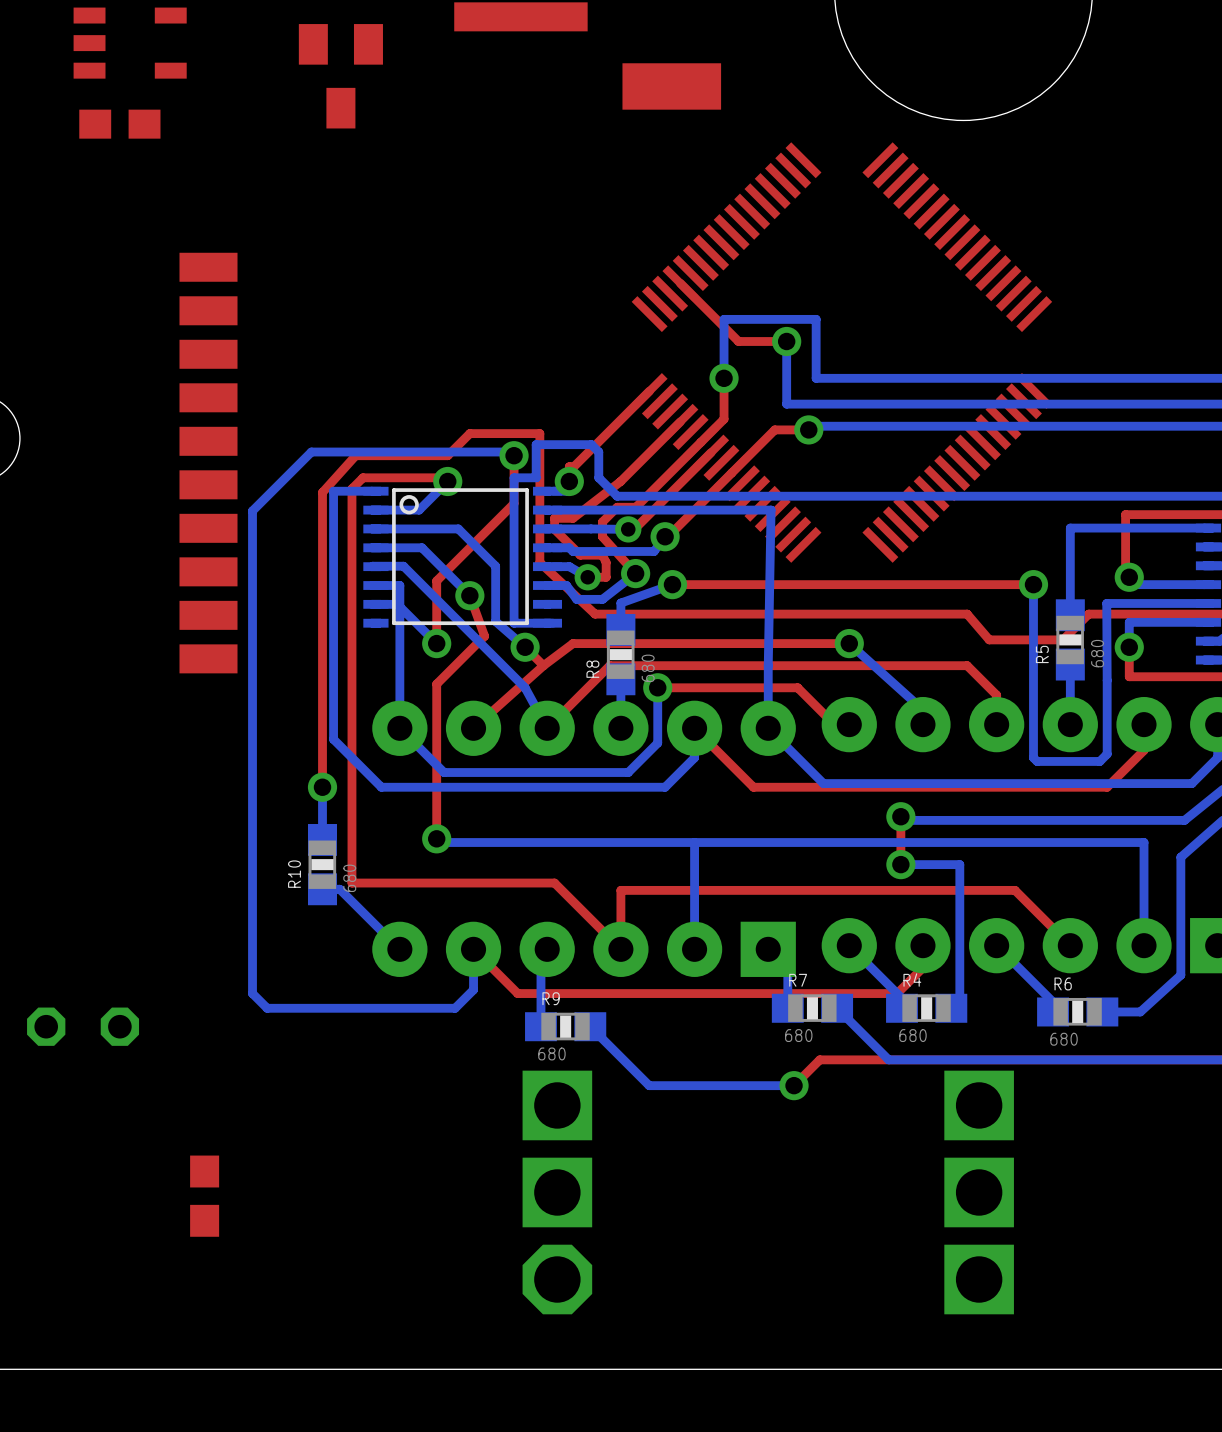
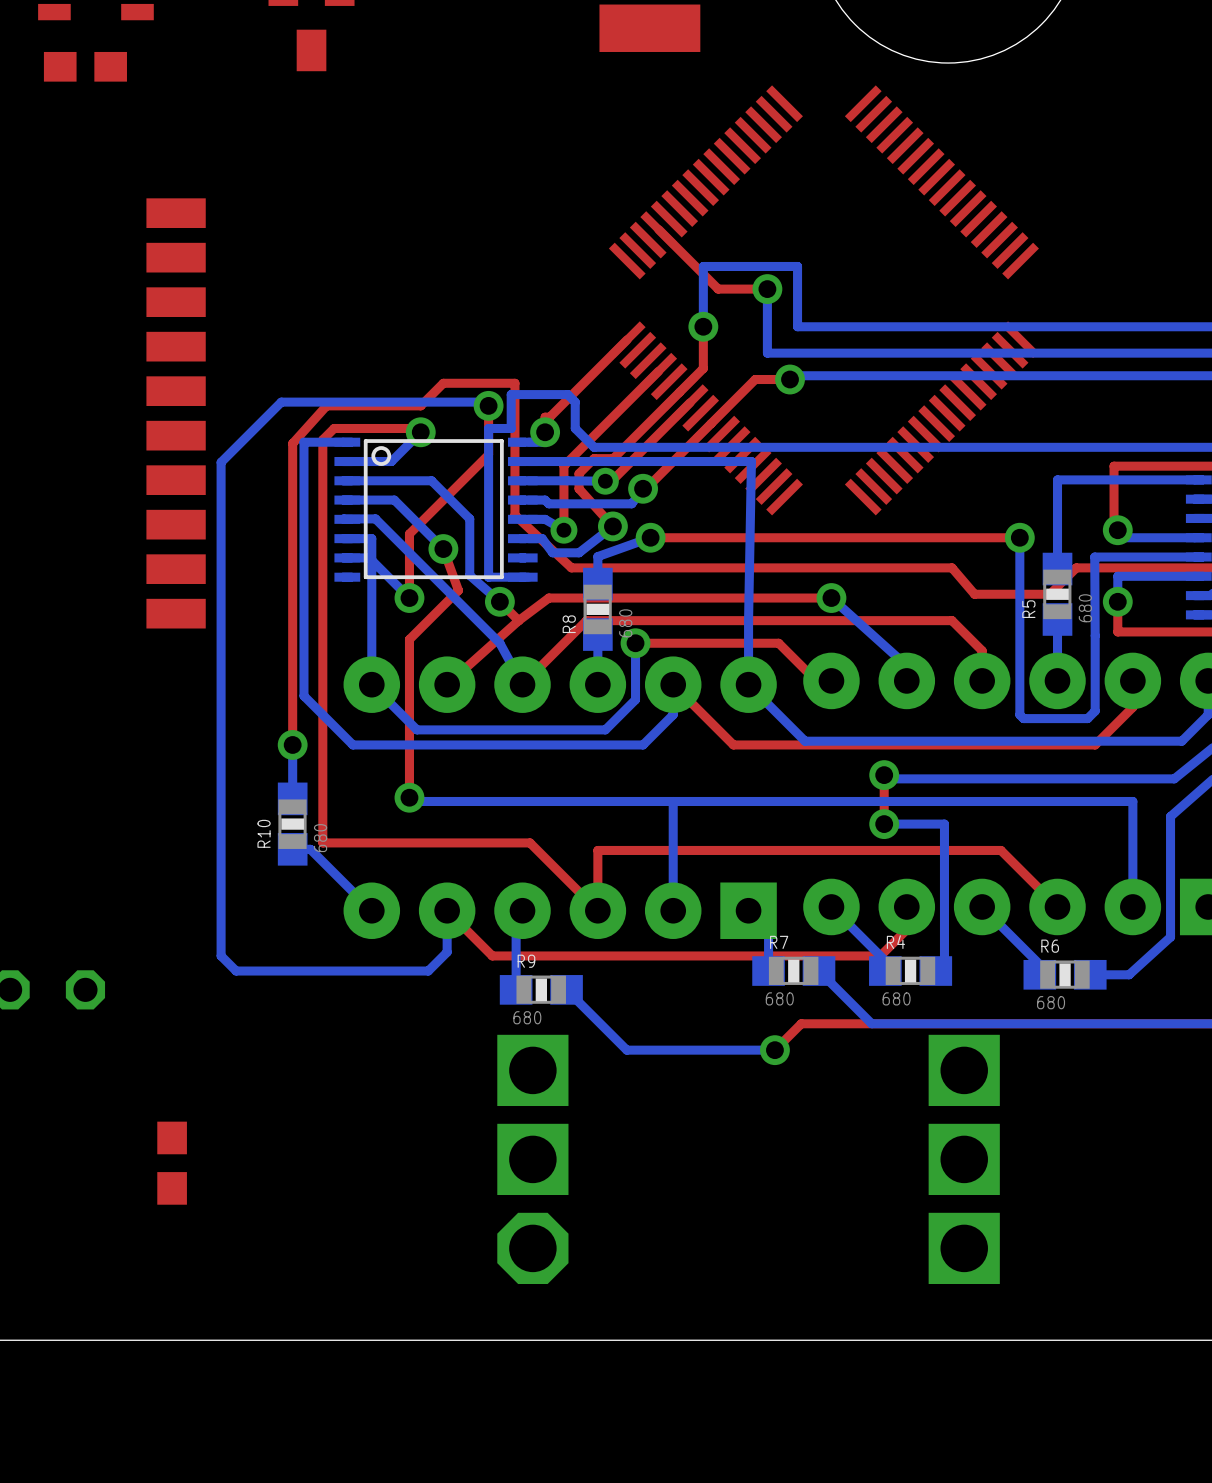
top track: (620, 481) (573, 518) (554, 518) (554, 529) (580, 555) (602, 555) (606, 562) (606, 577) (587, 577) -> (597, 432) (563, 465) (563, 530)

